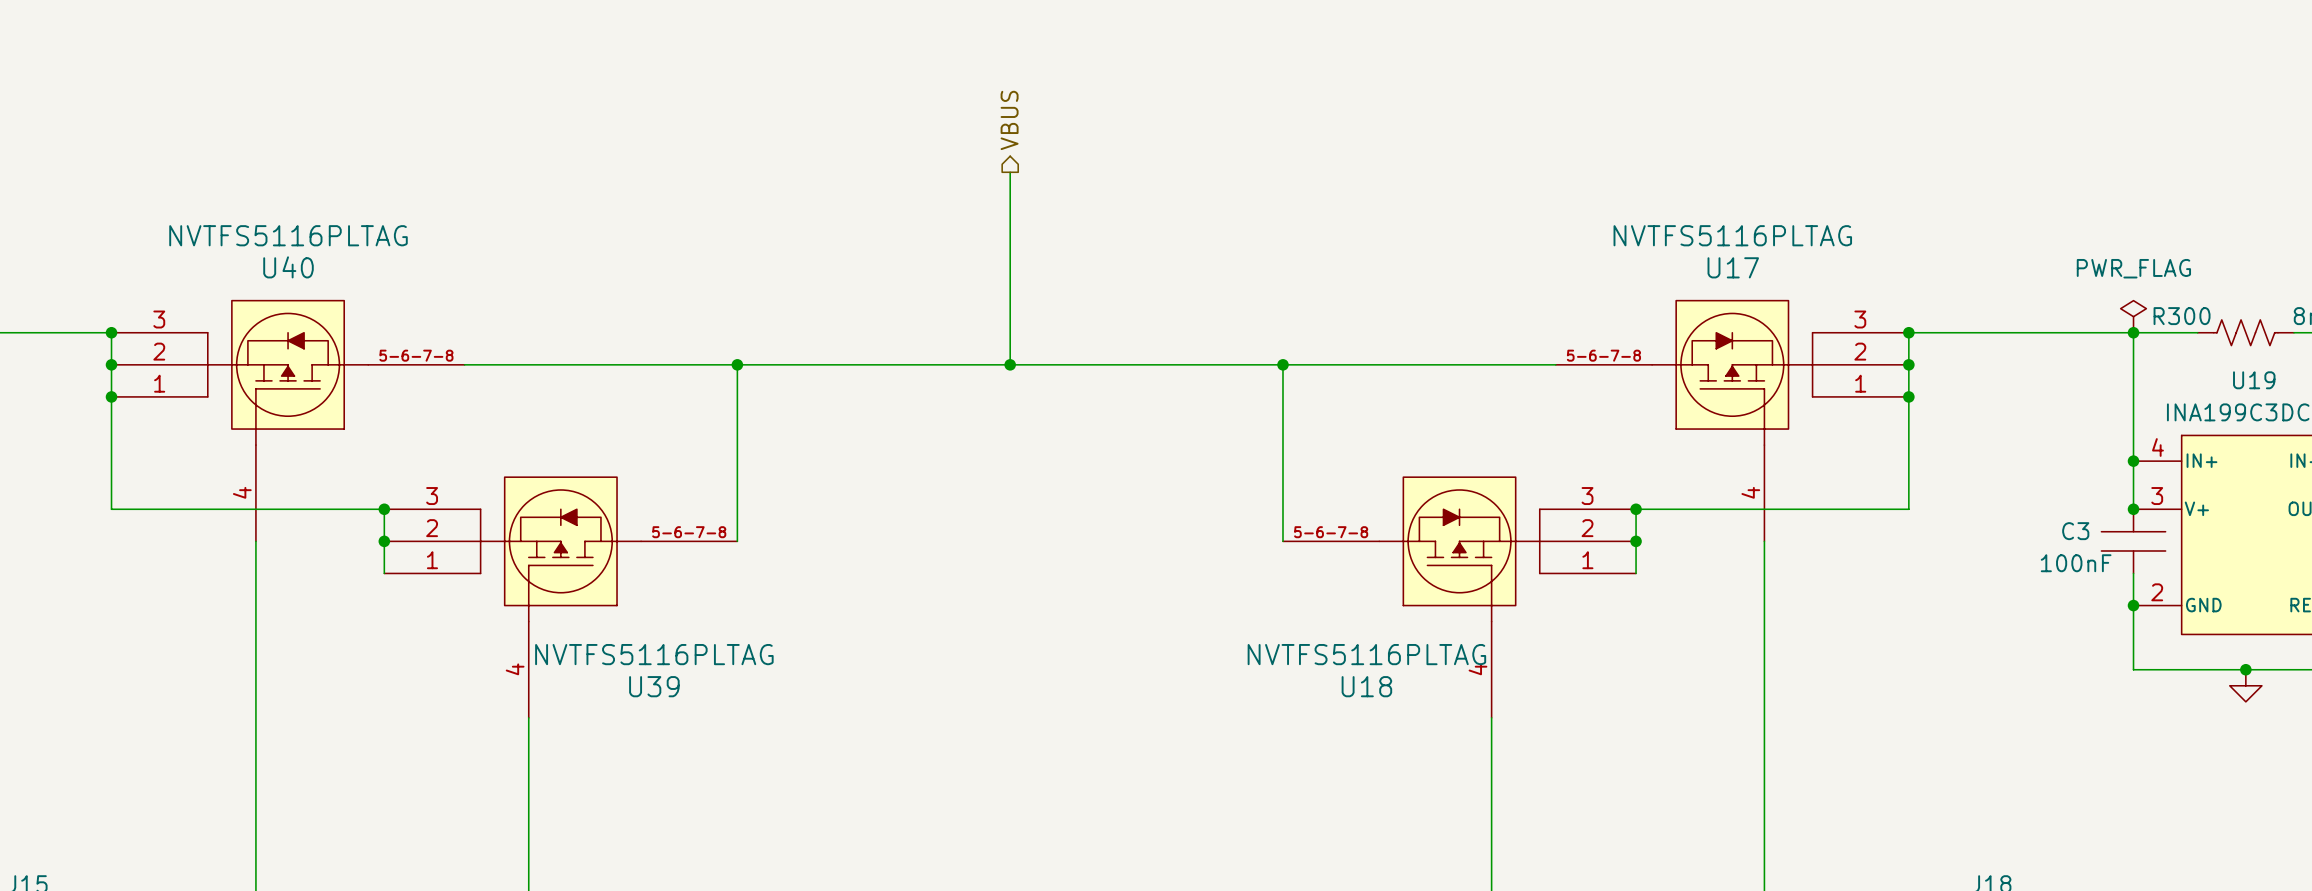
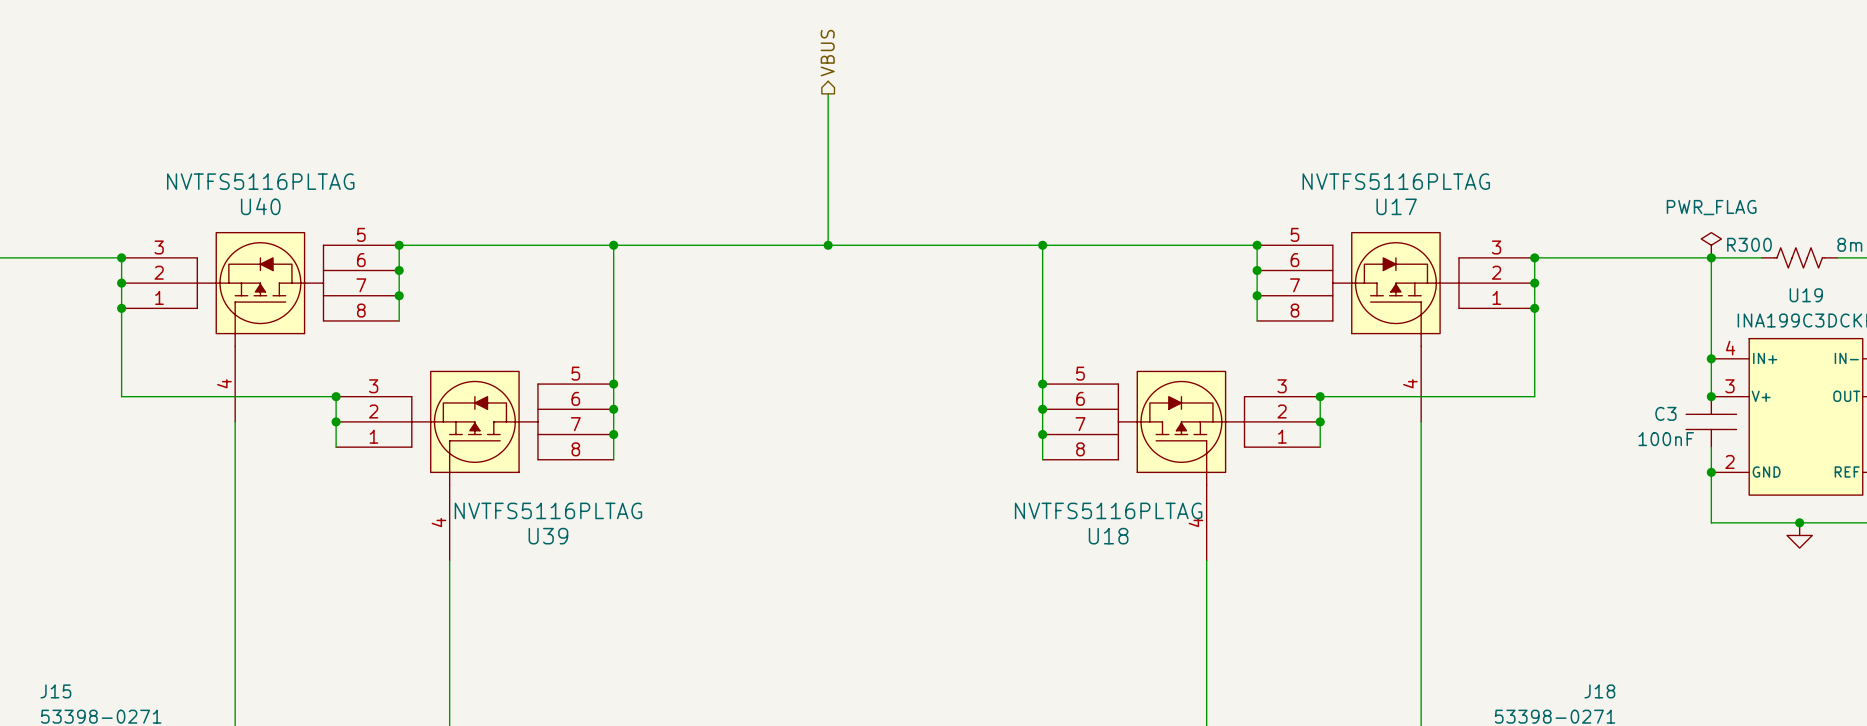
hierarchical label position: VBUS (1009, 120) -> VBUS (827, 53)
U40 symbol: [111, 300, 465, 542] -> [121, 232, 400, 422]
U17 symbol: [1555, 300, 1909, 542] -> [1257, 232, 1535, 422]
junction: none -> (399, 245)
wire: none -> (613, 245) (613, 283)
wire: (1010, 316) (1010, 364) -> (828, 93) (828, 131)
wire: none -> (1042, 245) (1042, 283)
junction: none -> (1257, 245)
junction: none -> (399, 270)
junction: none -> (1257, 270)
wire: (464, 364) (1555, 364) -> none
junction position: (737, 364) -> (613, 245)
junction position: (1010, 364) -> (828, 245)
junction position: (1282, 364) -> (1042, 245)
junction: none -> (399, 295)
junction: none -> (1257, 295)
wire: none -> (399, 320) (399, 245) (1257, 245) (1257, 320)
U39 symbol: [384, 477, 738, 718] -> [336, 371, 614, 561]
U18 symbol: [1282, 477, 1637, 718] -> [1042, 371, 1321, 561]
junction: none -> (613, 384)
junction: none -> (1042, 384)
junction: none -> (613, 409)
junction: none -> (1042, 409)
wire: none -> (613, 421) (613, 459)
wire: none -> (1042, 421) (1042, 459)
junction: none -> (613, 434)
junction: none -> (1042, 434)

